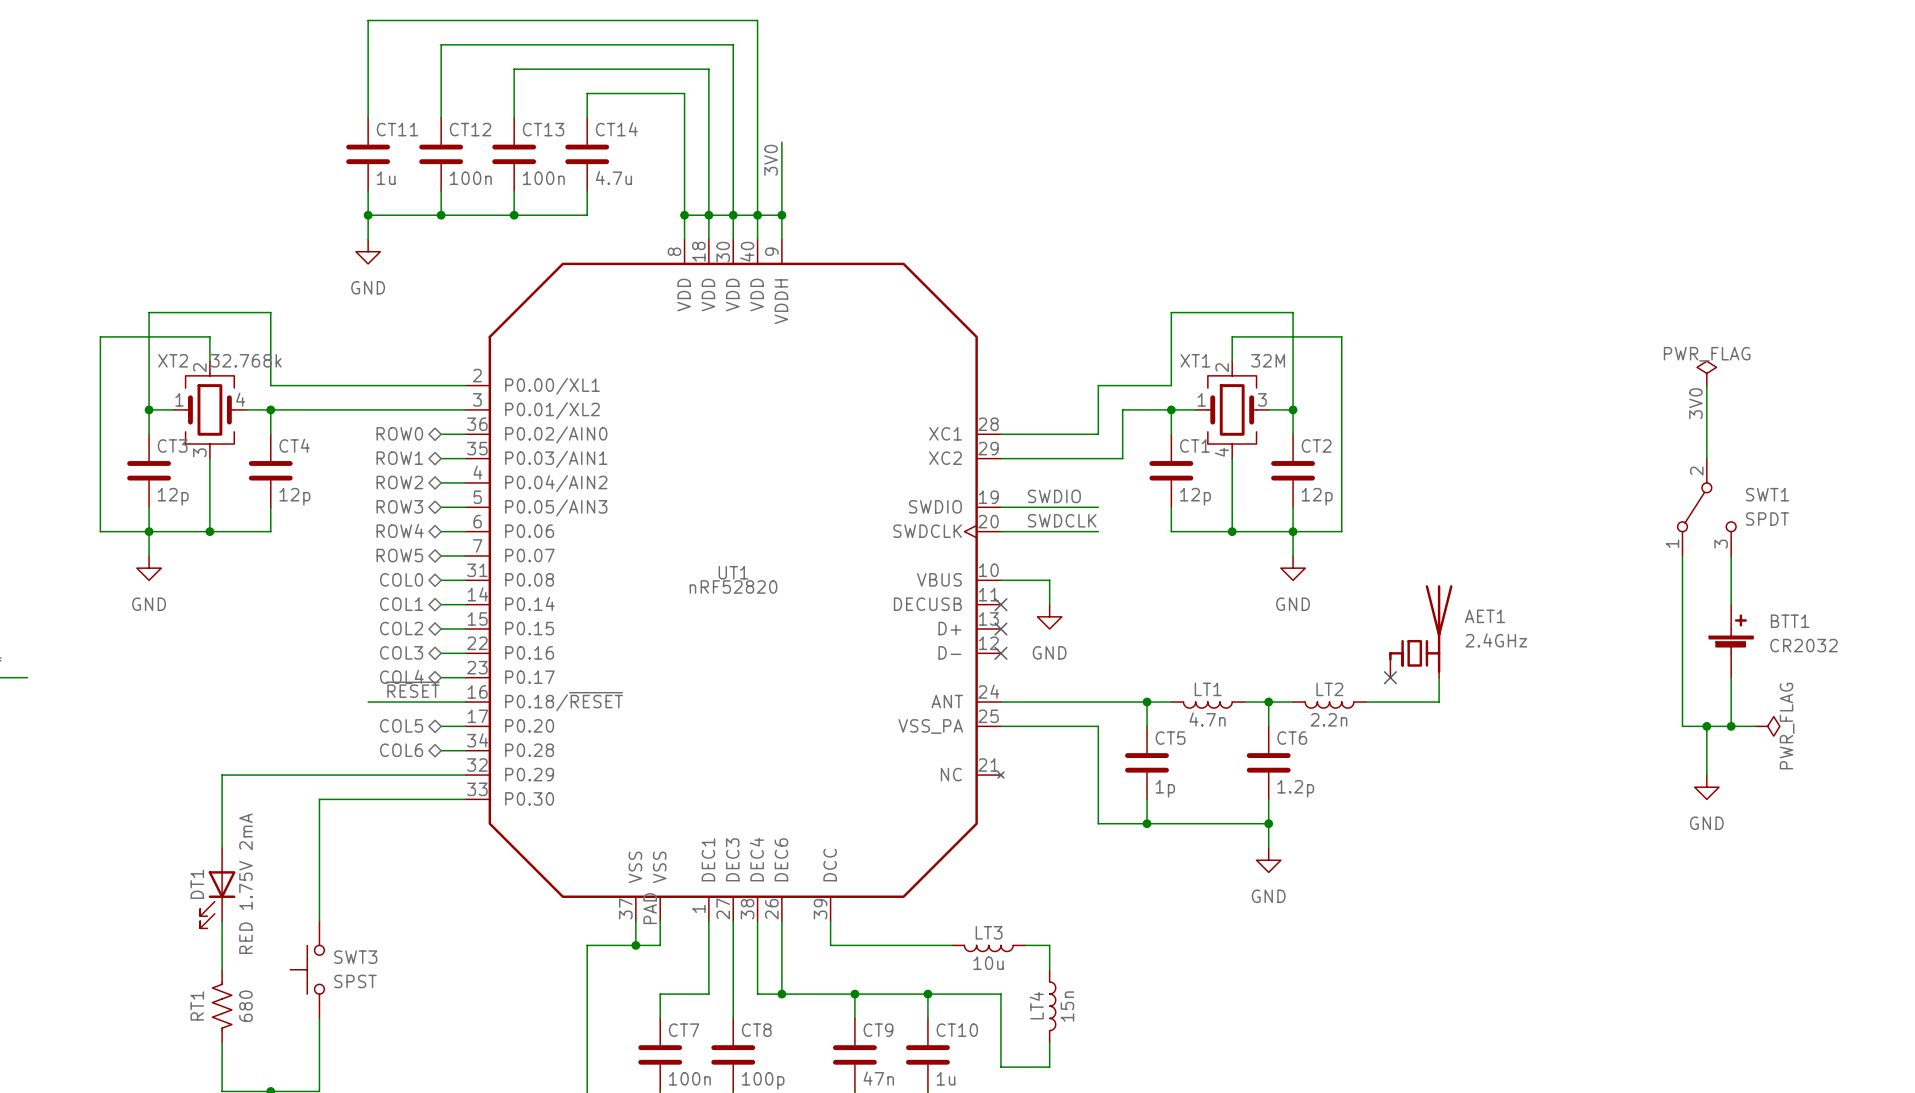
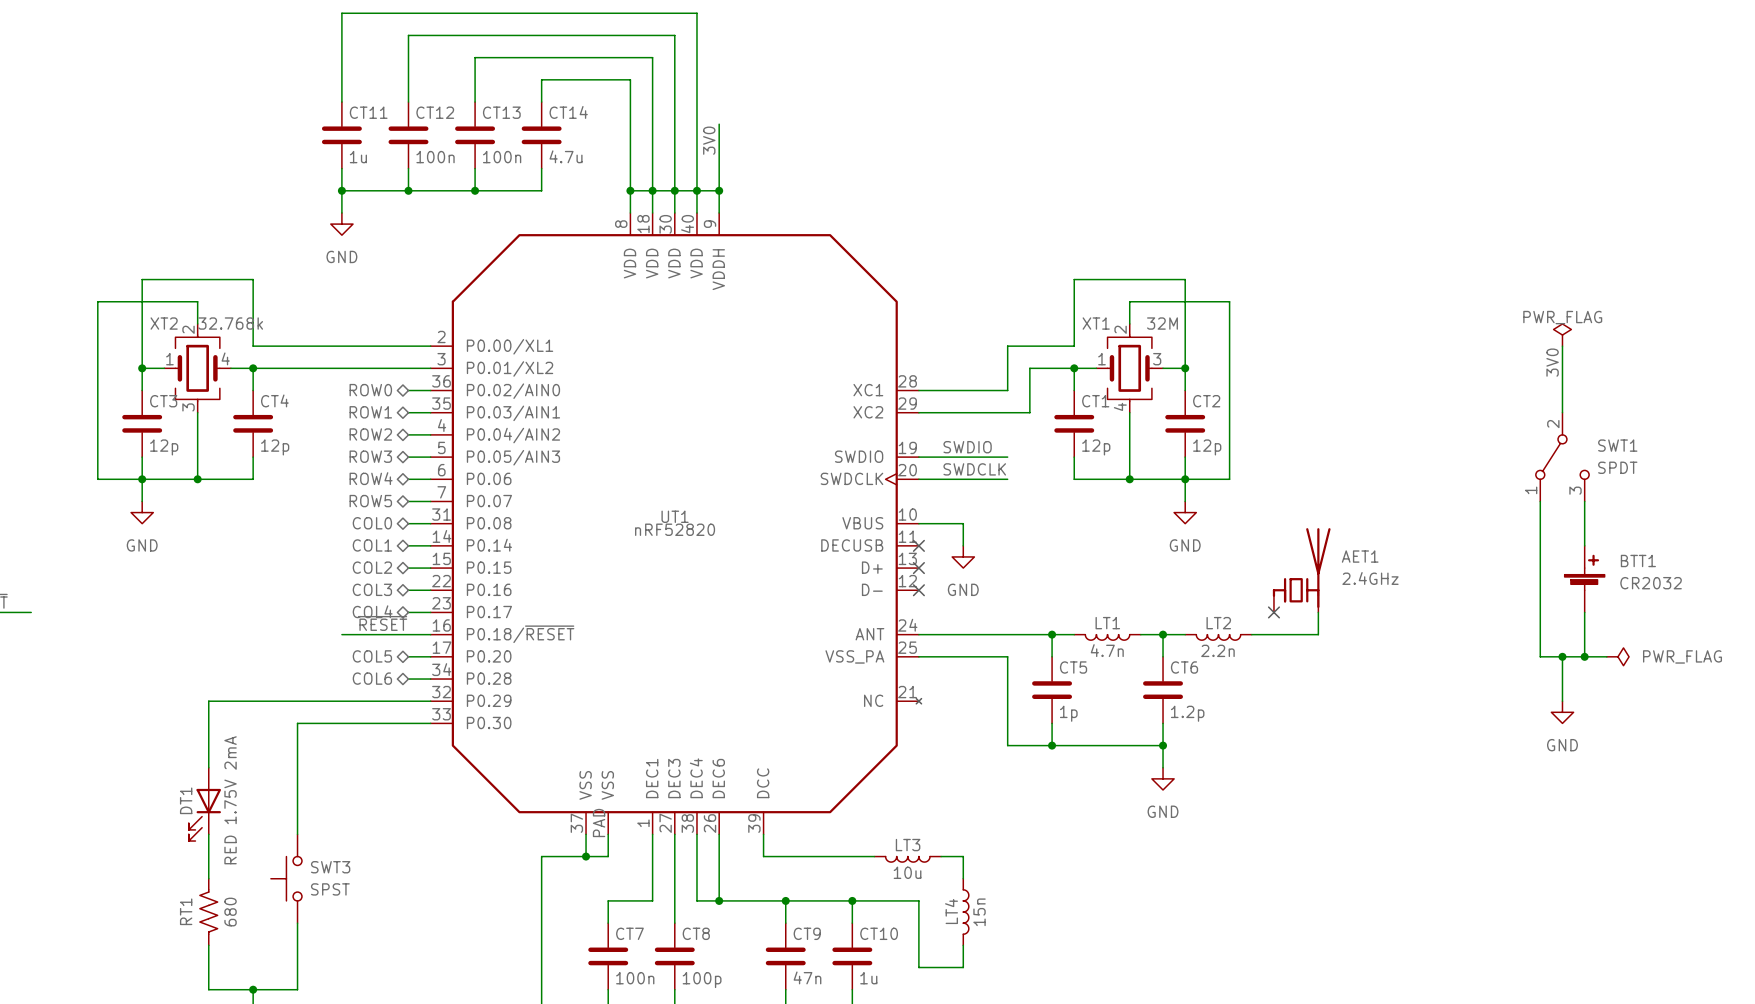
power symbol text rotation: 0° (1787, 726) -> 90° clockwise (1682, 656)

